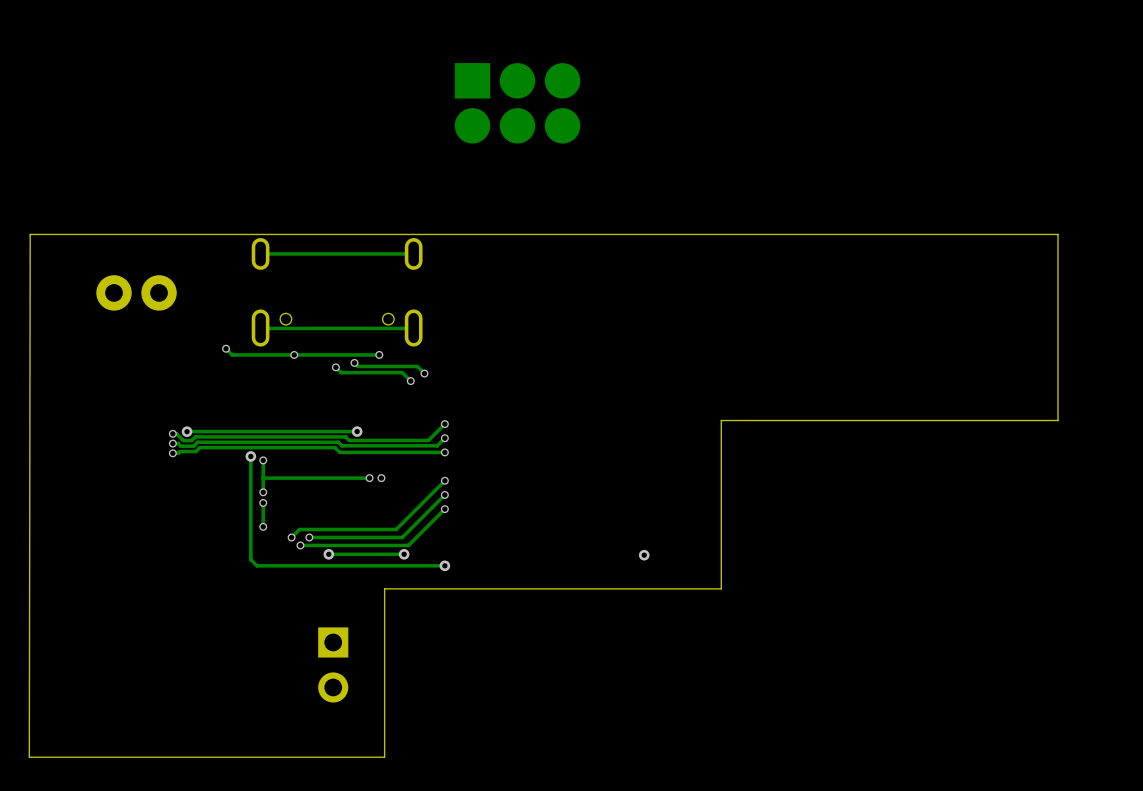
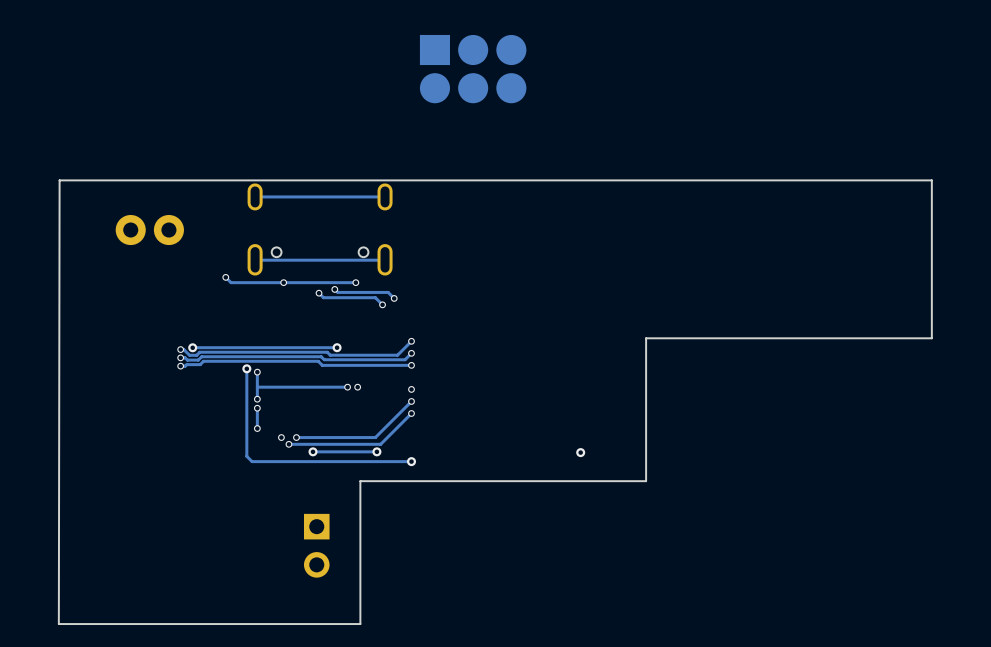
track: (444, 480) (396, 529) (299, 529) (291, 537) -> none

